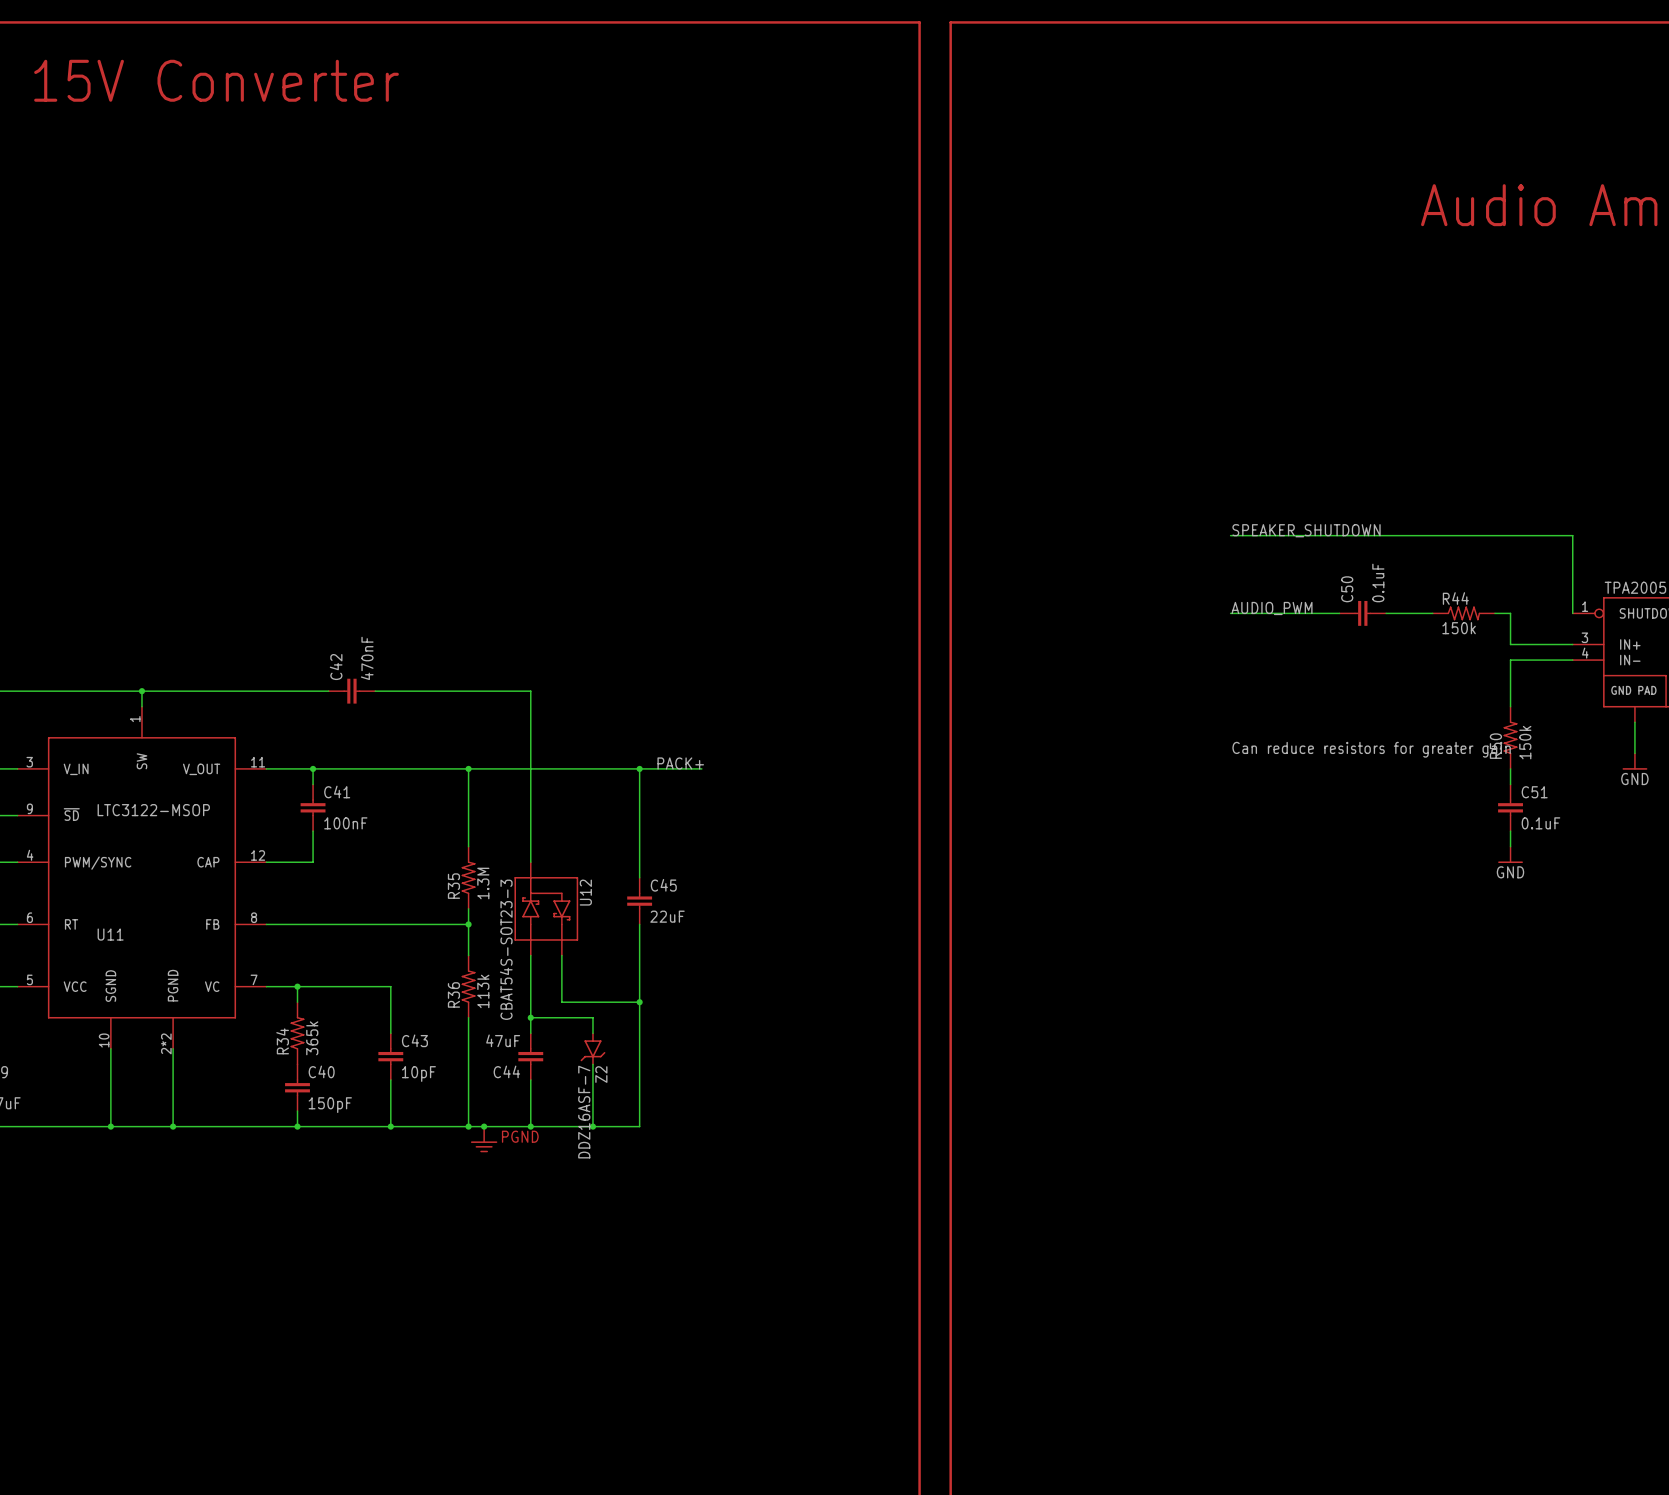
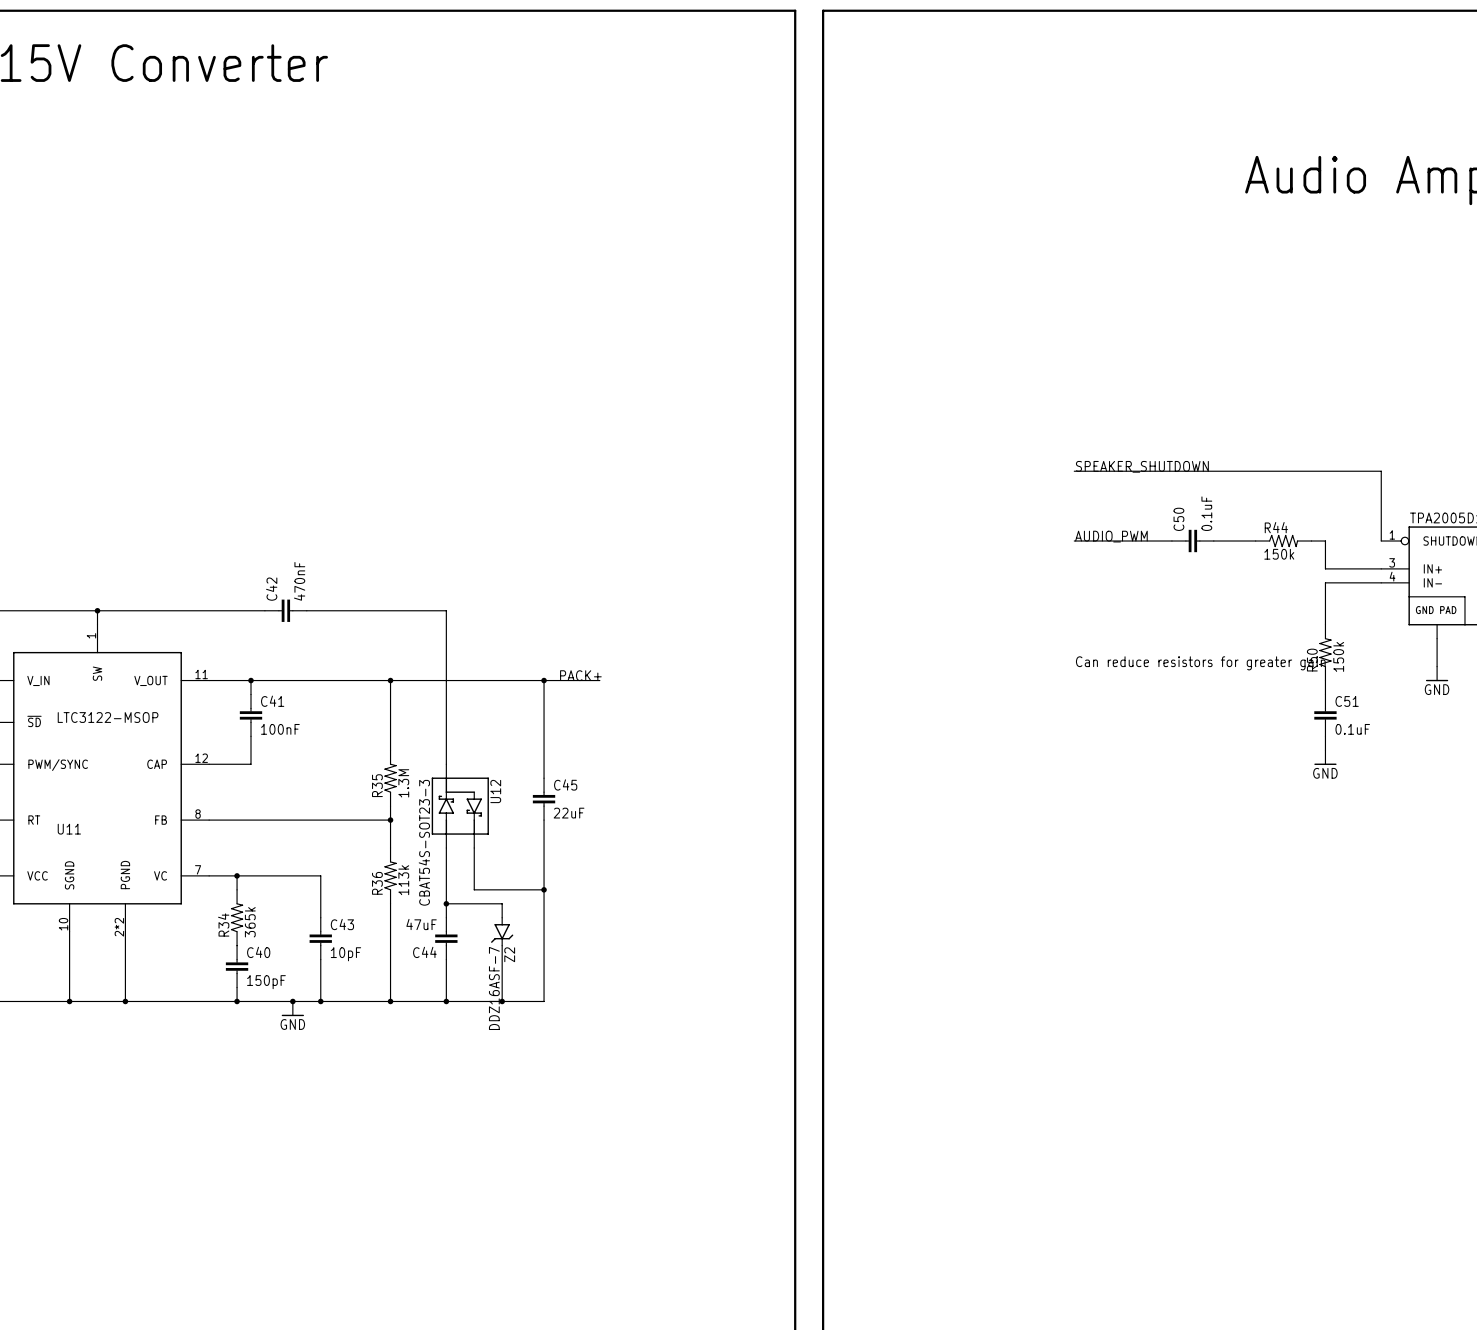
junction: none -> (292, 1001)
junction: (484, 1126) -> none
power symbol: none -> GND (292, 1008)
power symbol: PGND (484, 1139) -> none

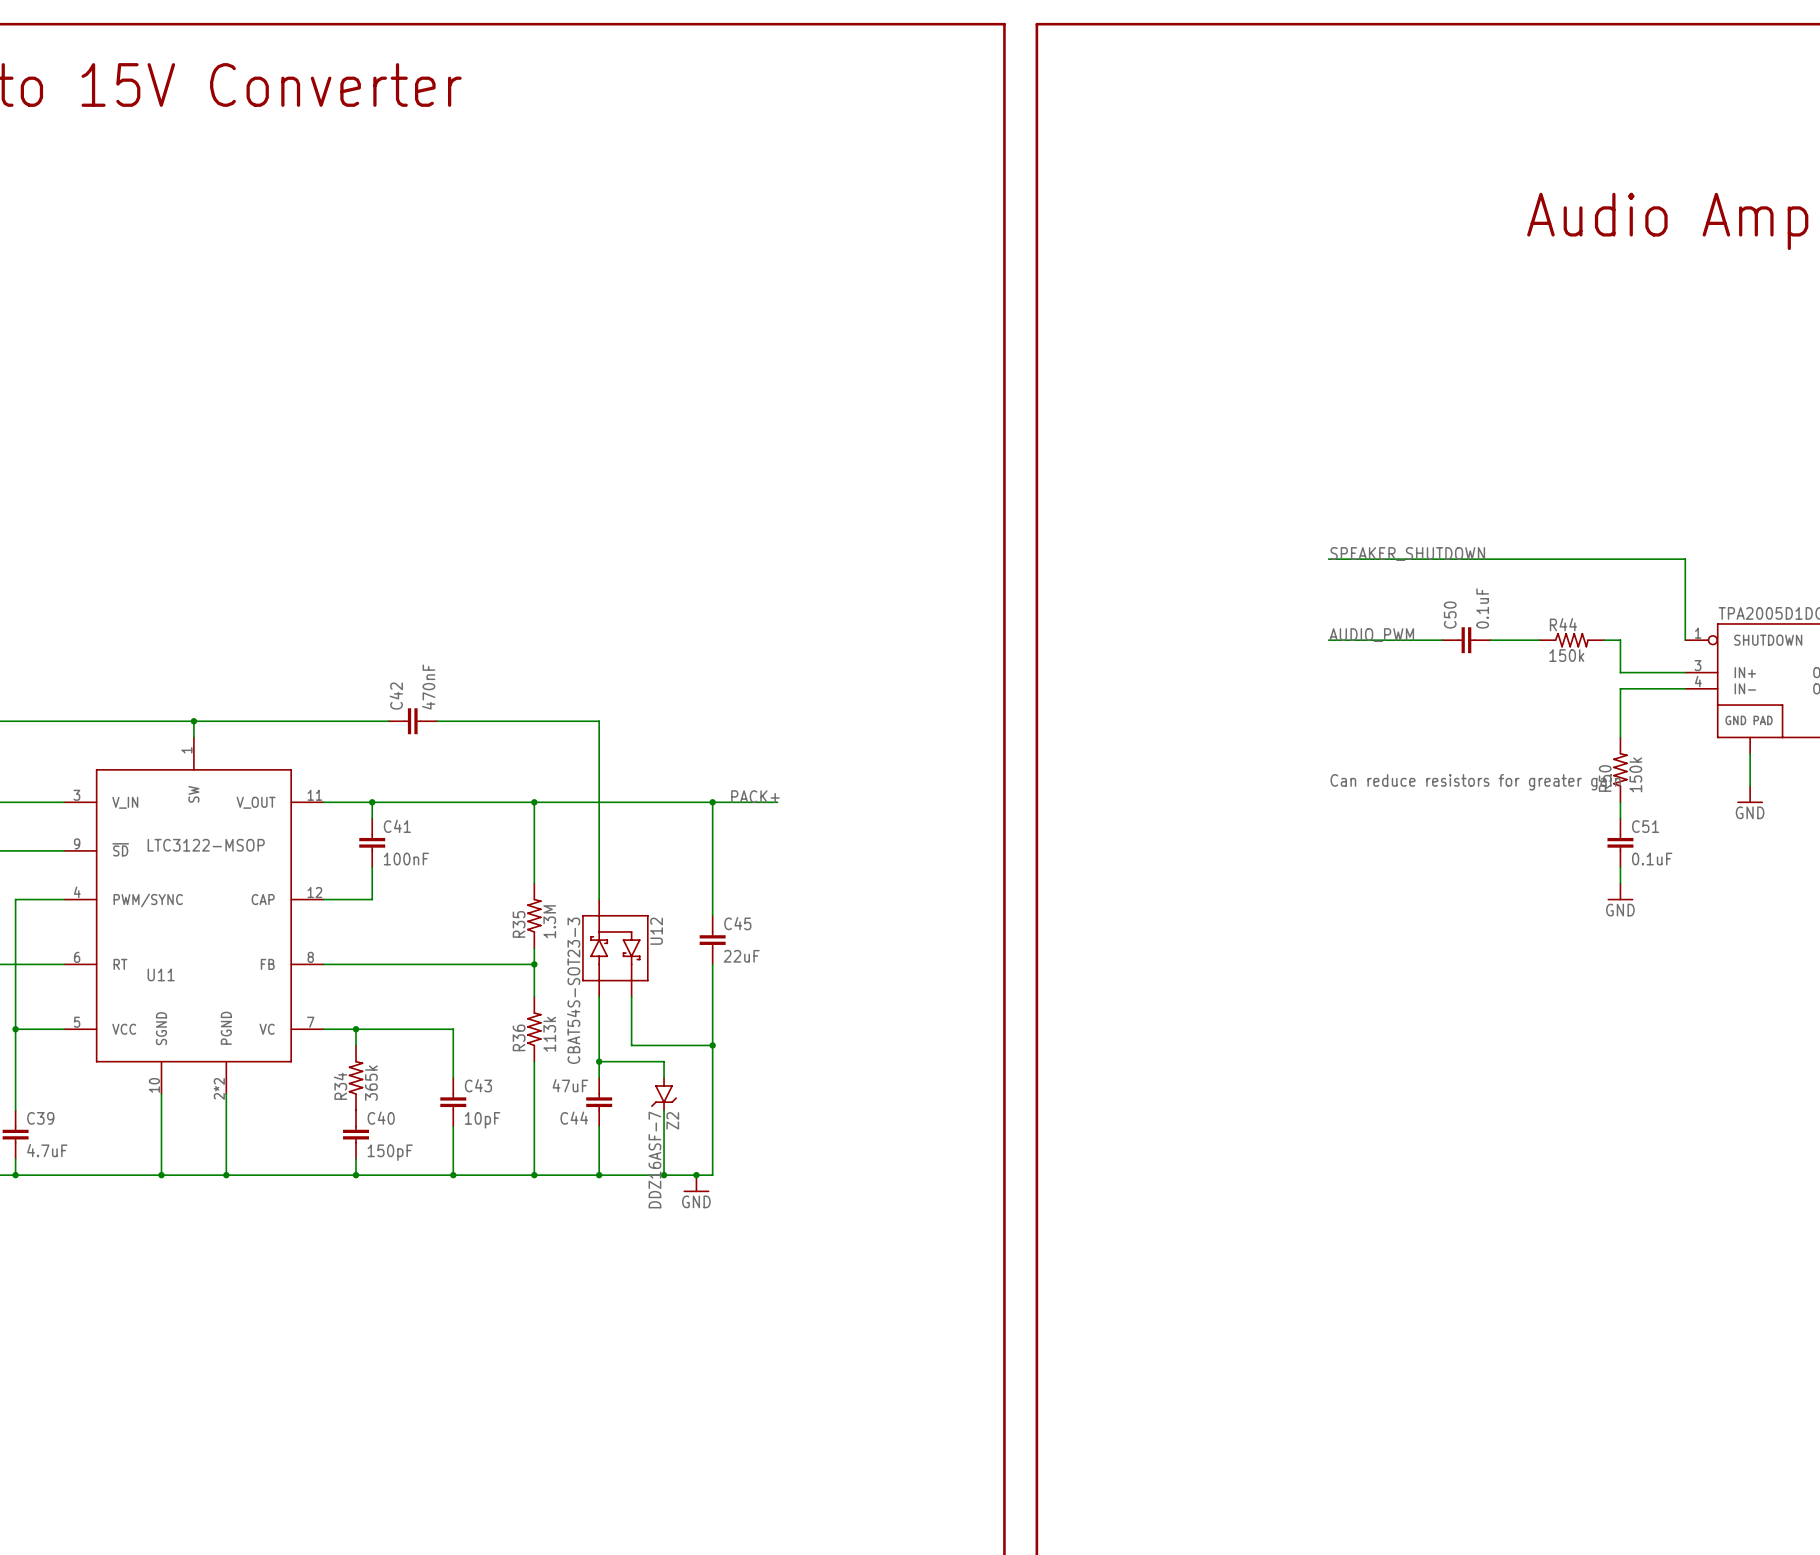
junction: (292, 1001) -> none
junction: none -> (696, 1175)
power symbol: GND (292, 1008) -> none
power symbol: none -> GND (696, 1183)

